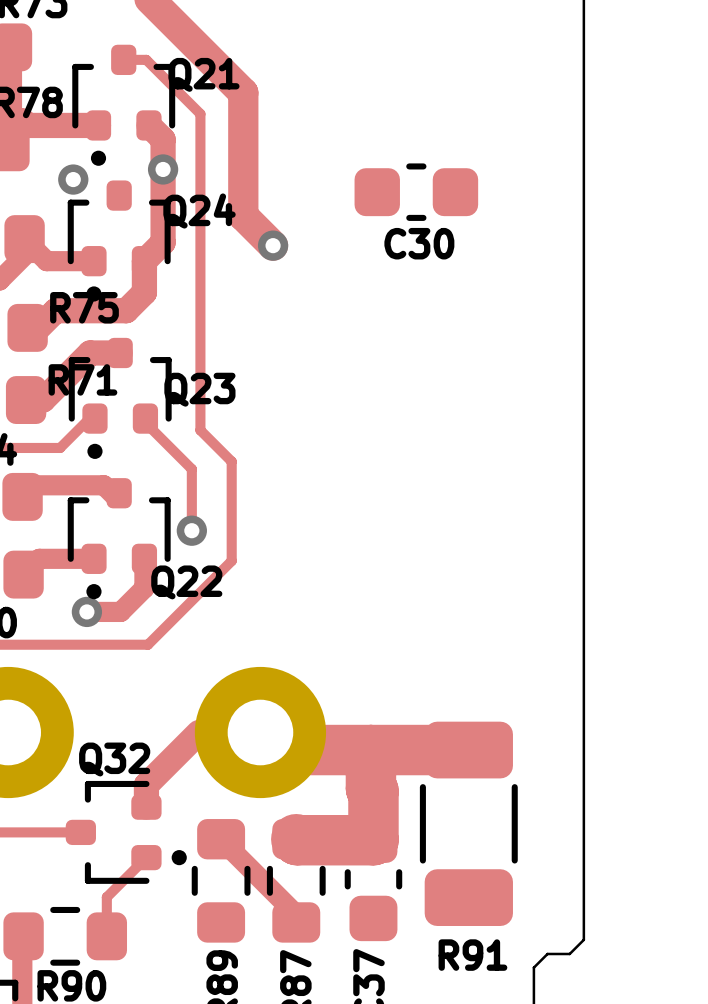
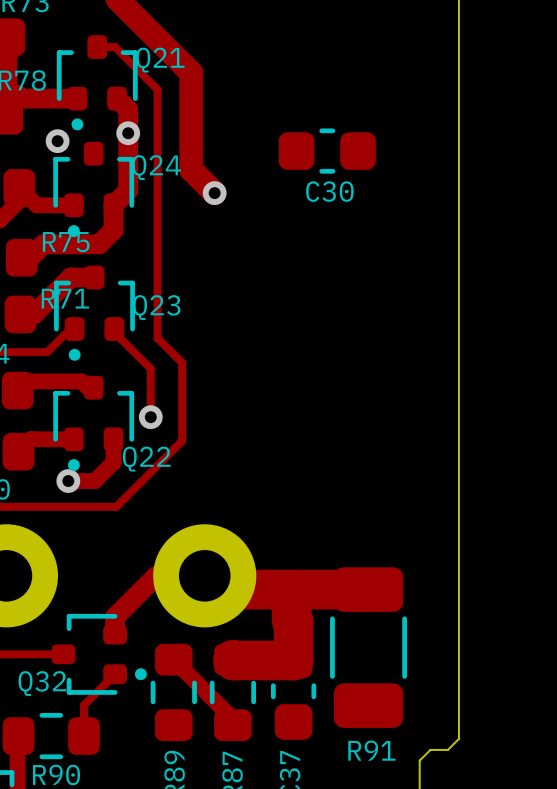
Q32 name position: Q32 (114, 759) -> Q32 (42, 683)

